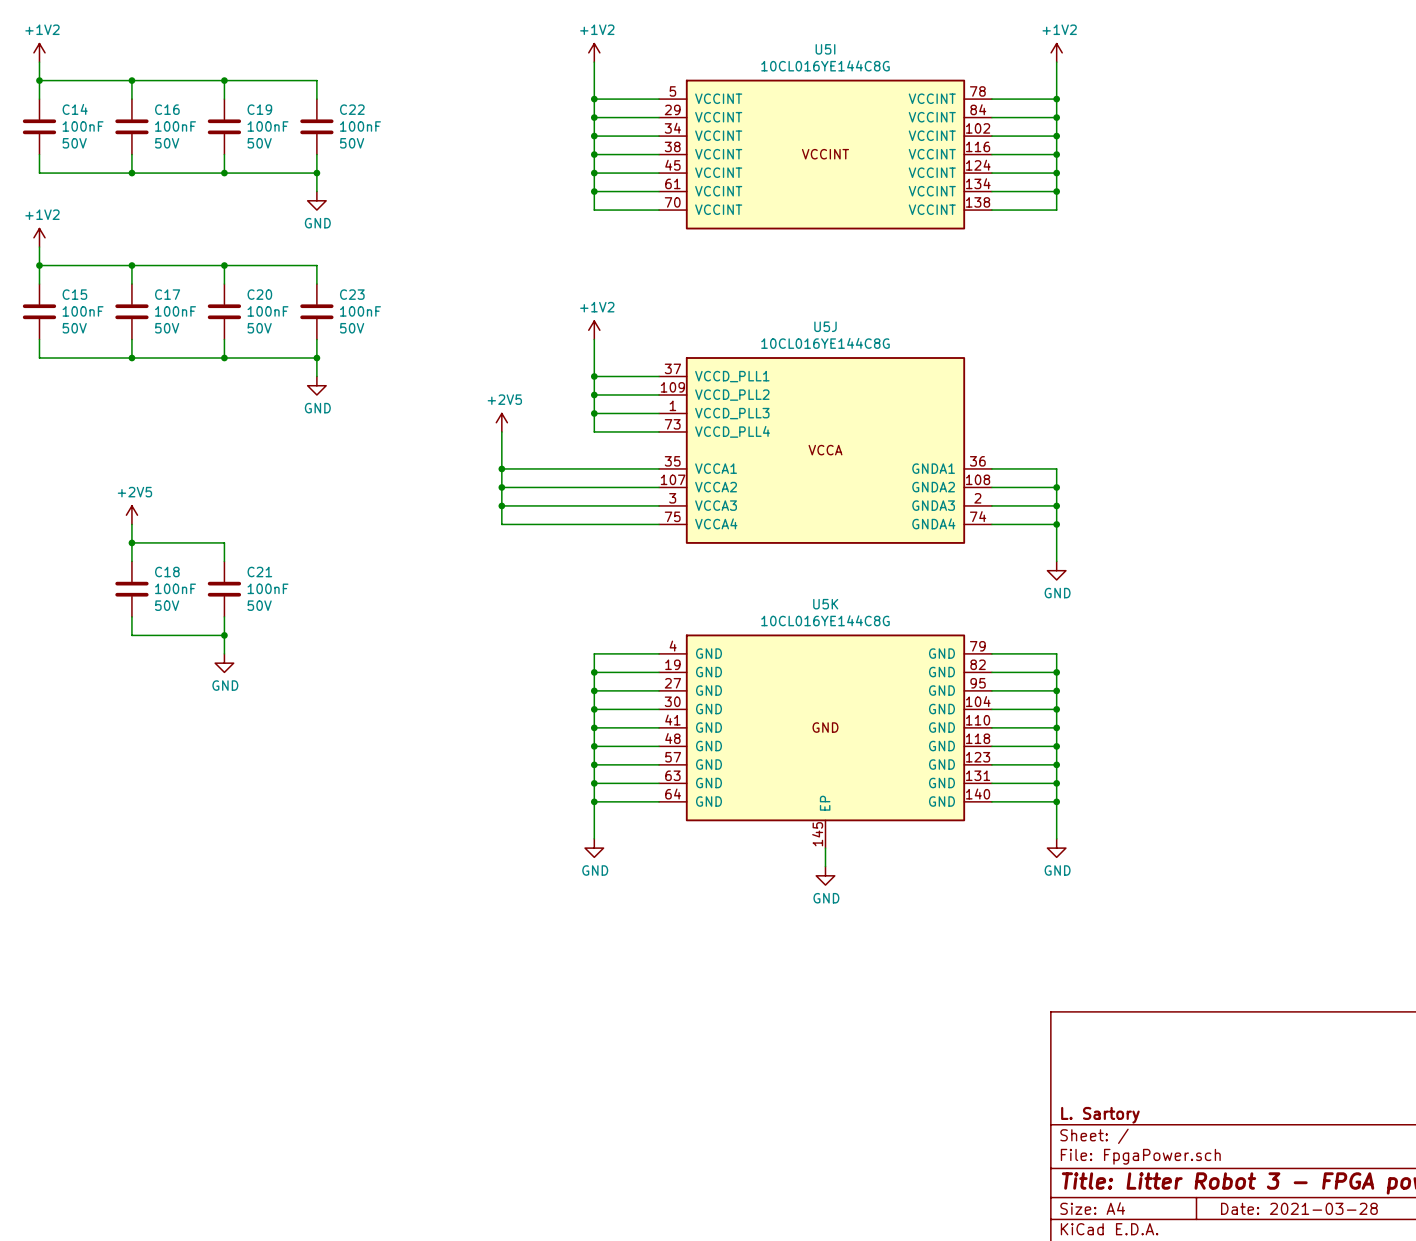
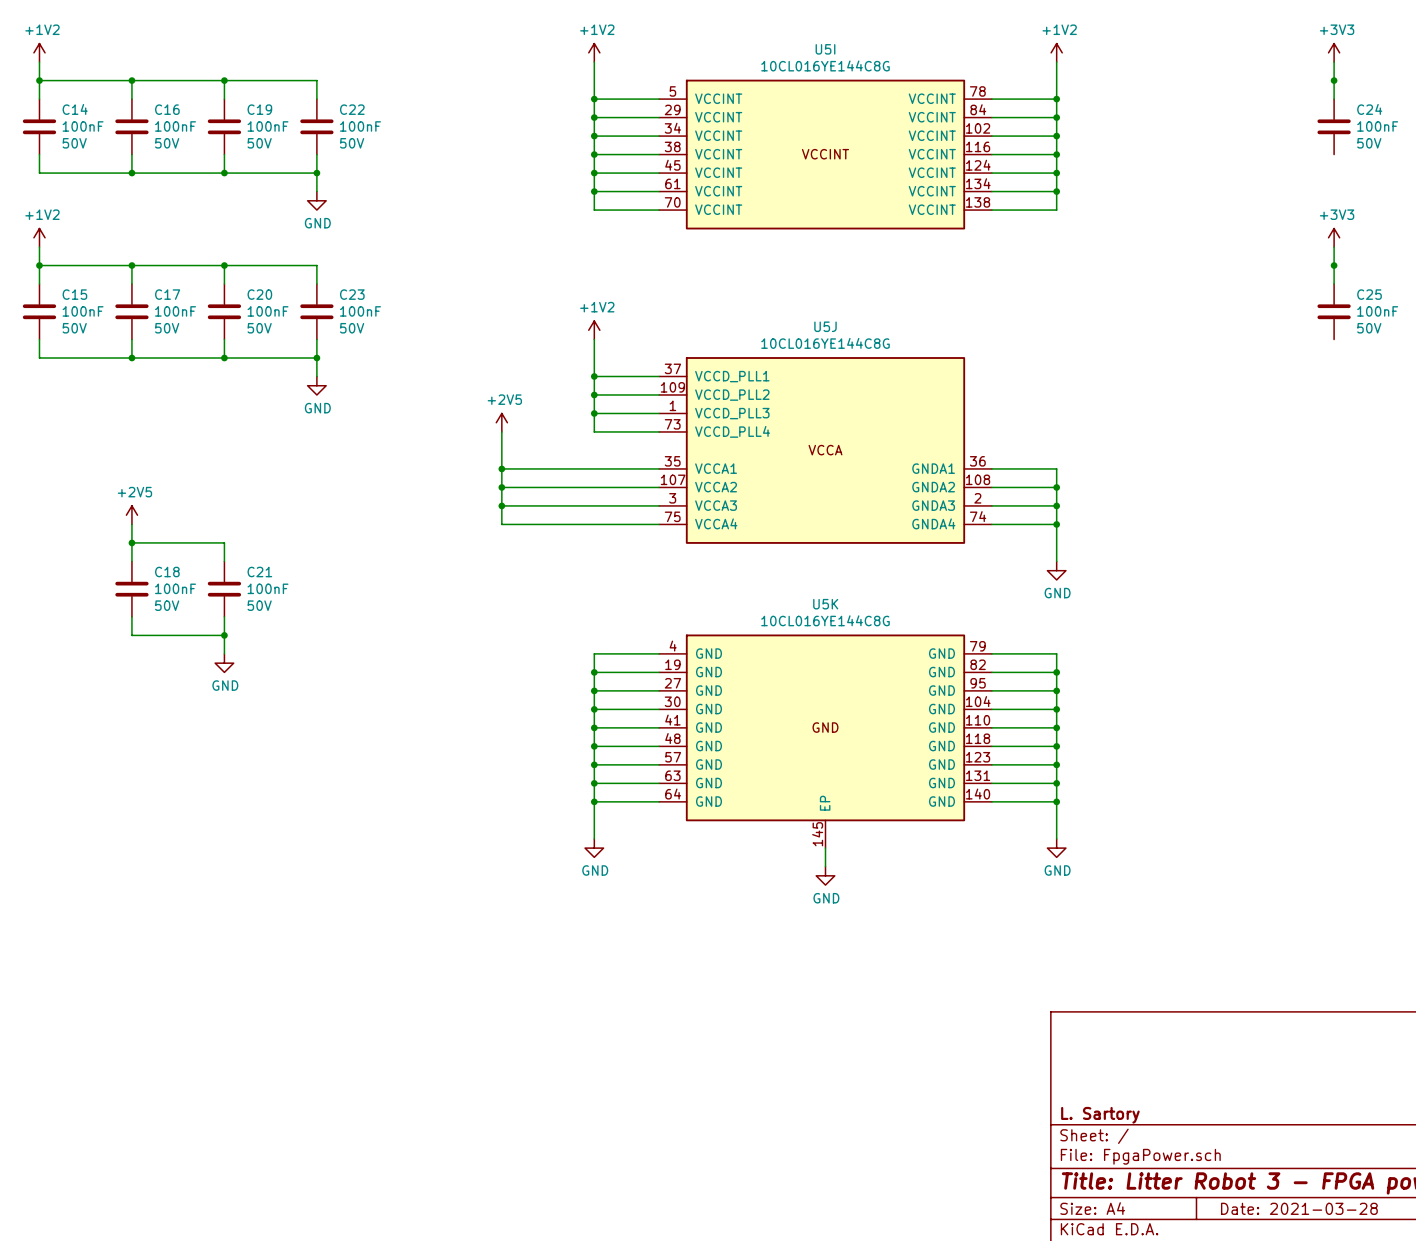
power symbol: none -> +3V3 (1334, 52)
wire: none -> (1334, 62) (1334, 99)
junction: none -> (1334, 80)
C24: none -> 100nF (1334, 126)
power symbol: none -> +3V3 (1334, 237)
wire: none -> (1334, 247) (1334, 284)
junction: none -> (1334, 265)
C25: none -> 100nF (1334, 311)

